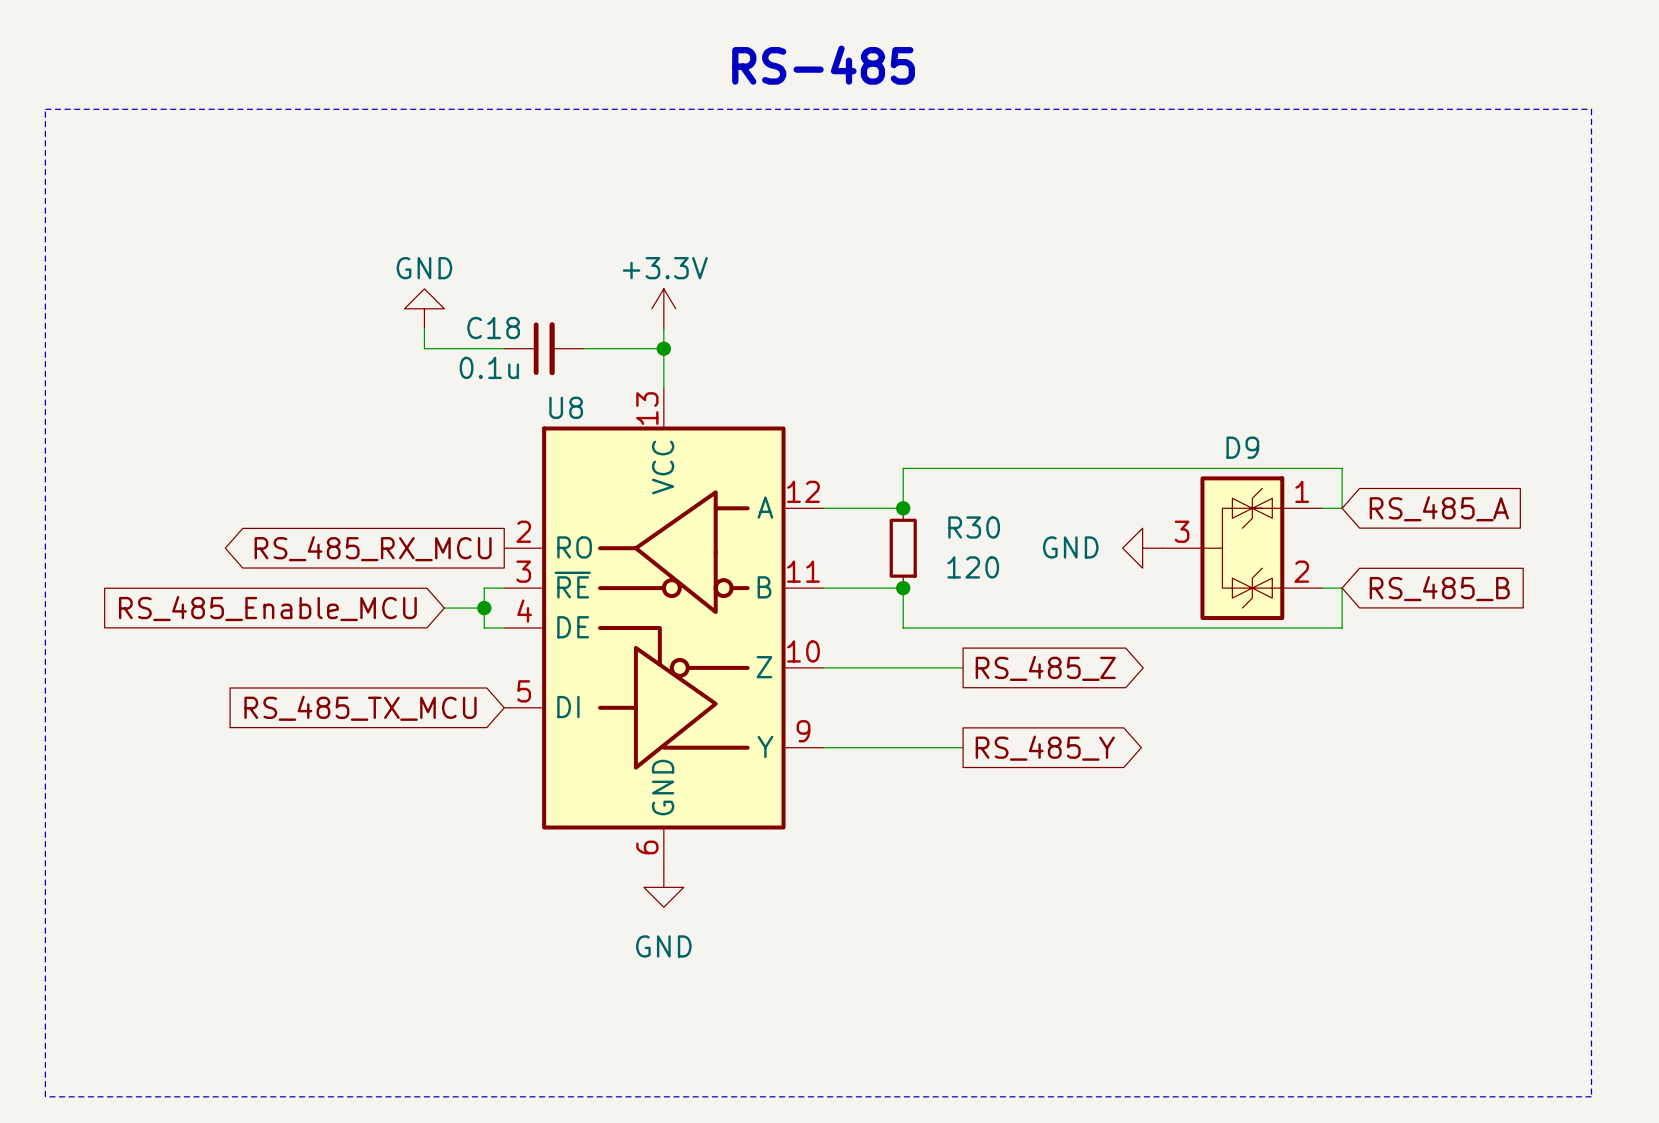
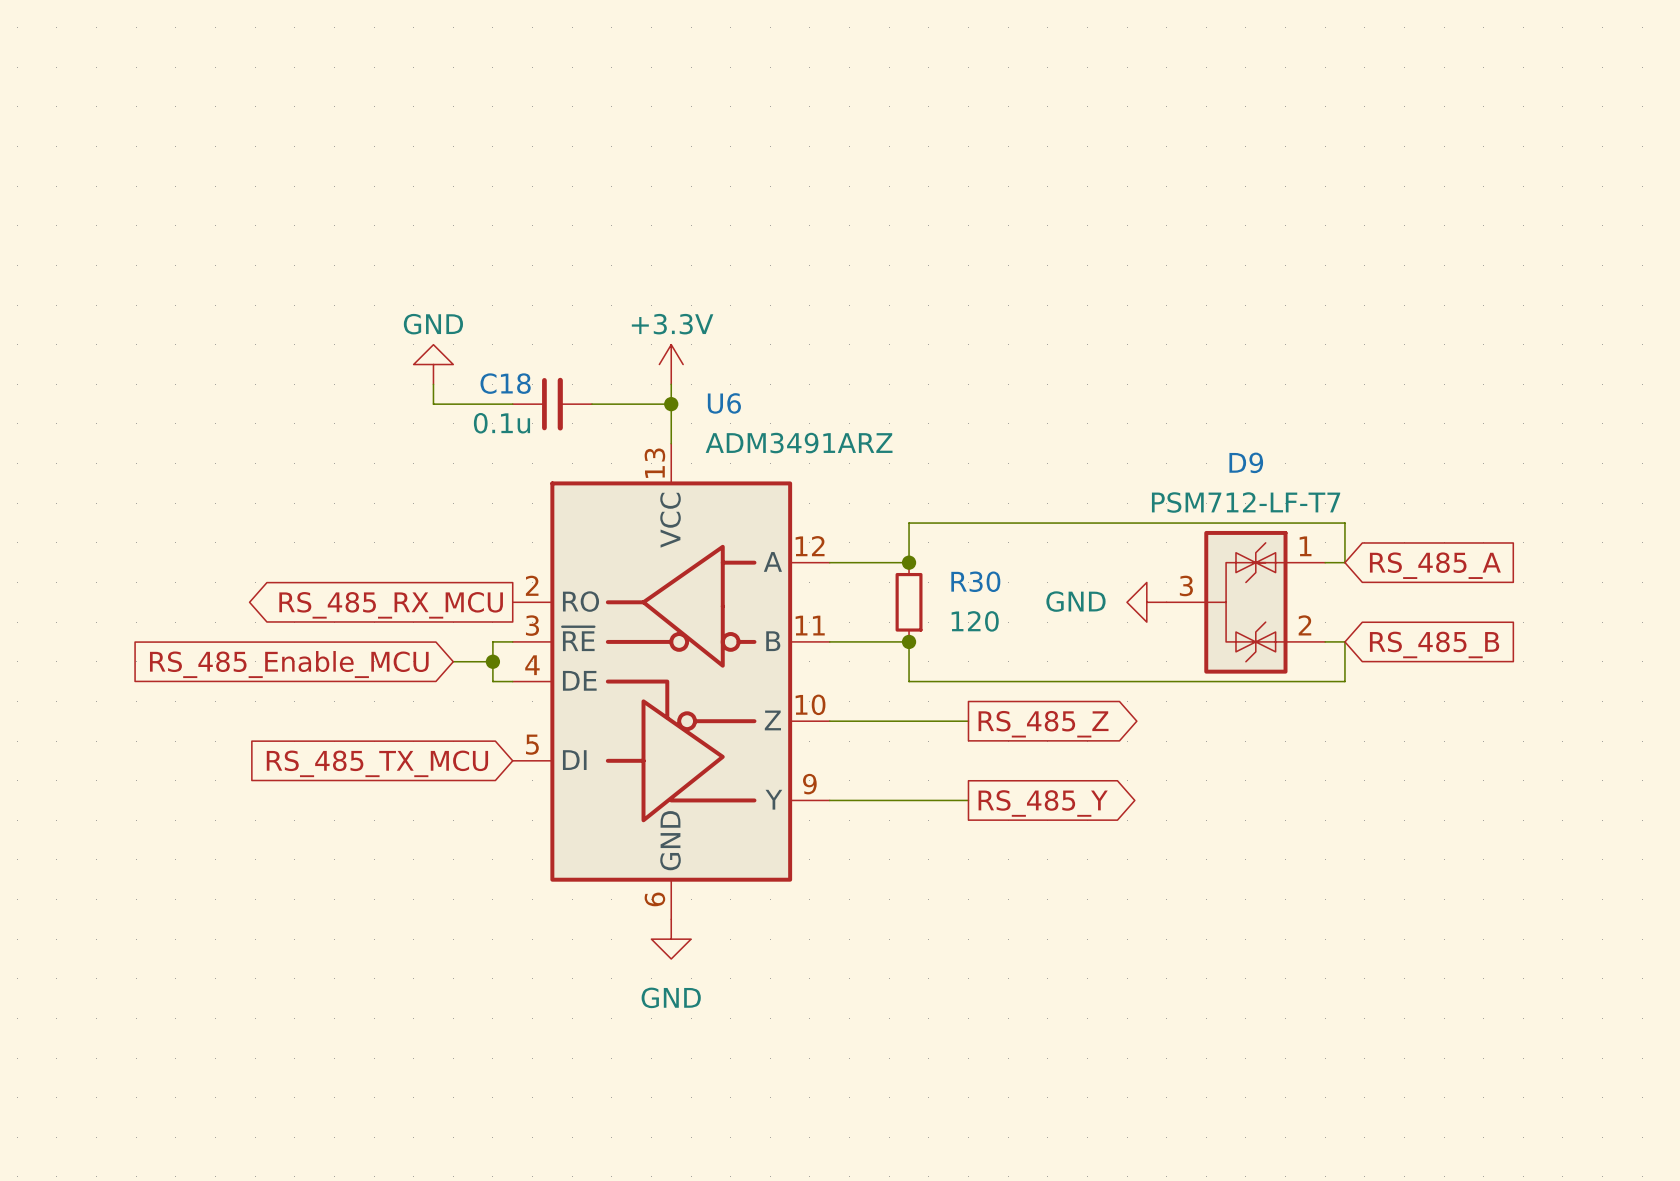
text: RS-485 (823, 65) -> none
line: (45, 109) (1591, 109) (1591, 1096) (45, 1096) (45, 109) -> none
U8 value: none -> ADM3491ARZ (799, 443)
U8 name: U8 (566, 407) -> U6 (724, 403)
D9 name position: D9 (1242, 447) -> D9 (1246, 462)
D9 value: none -> PSM712-LF-T7 (1246, 502)

